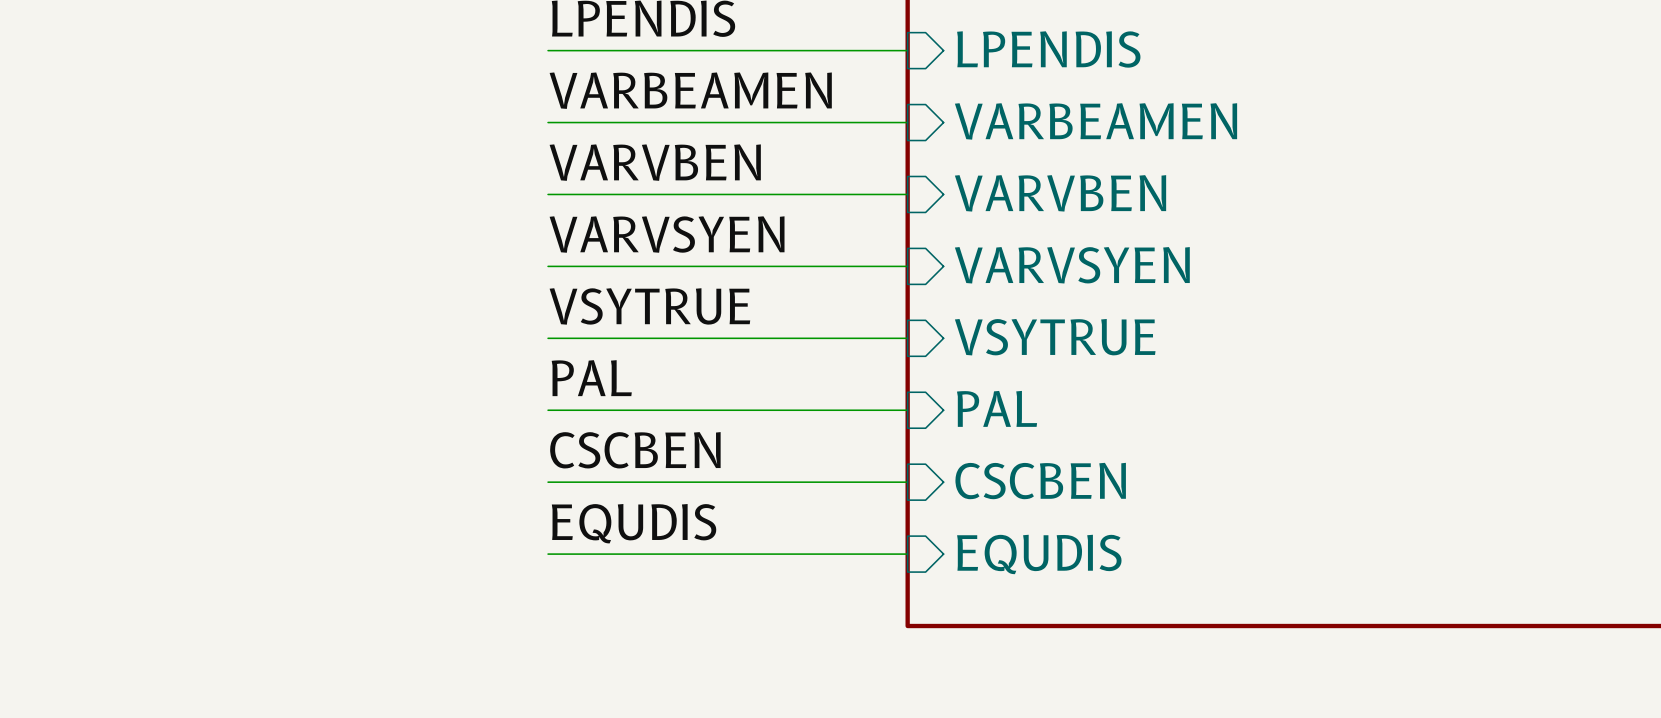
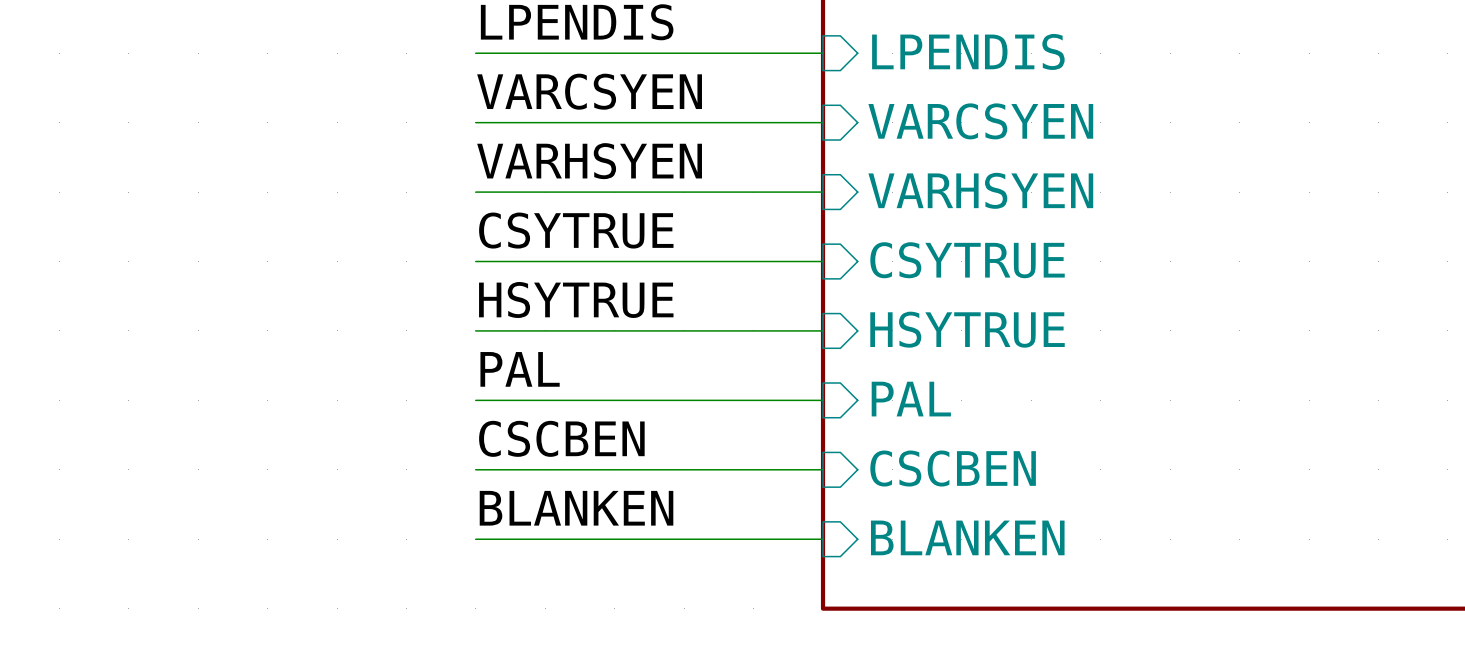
label: VARBEAMEN (690, 90) -> VARCSYEN (589, 91)
sheet pin: VARBEAMEN (1096, 121) -> VARCSYEN (980, 121)
label: VARVBEN (655, 162) -> VARHSYEN (589, 161)
sheet pin: VARVBEN (1060, 193) -> VARHSYEN (980, 190)
label: VARVSYEN (667, 234) -> CSYTRUE (576, 230)
sheet pin: VARVSYEN (1072, 265) -> CSYTRUE (967, 260)
label: VSYTRUE (649, 306) -> HSYTRUE (576, 299)
sheet pin: VSYTRUE (1055, 337) -> HSYTRUE (967, 329)
label: EQUDIS (634, 523) -> BLANKEN (576, 508)
sheet pin: EQUDIS (1039, 554) -> BLANKEN (967, 537)

